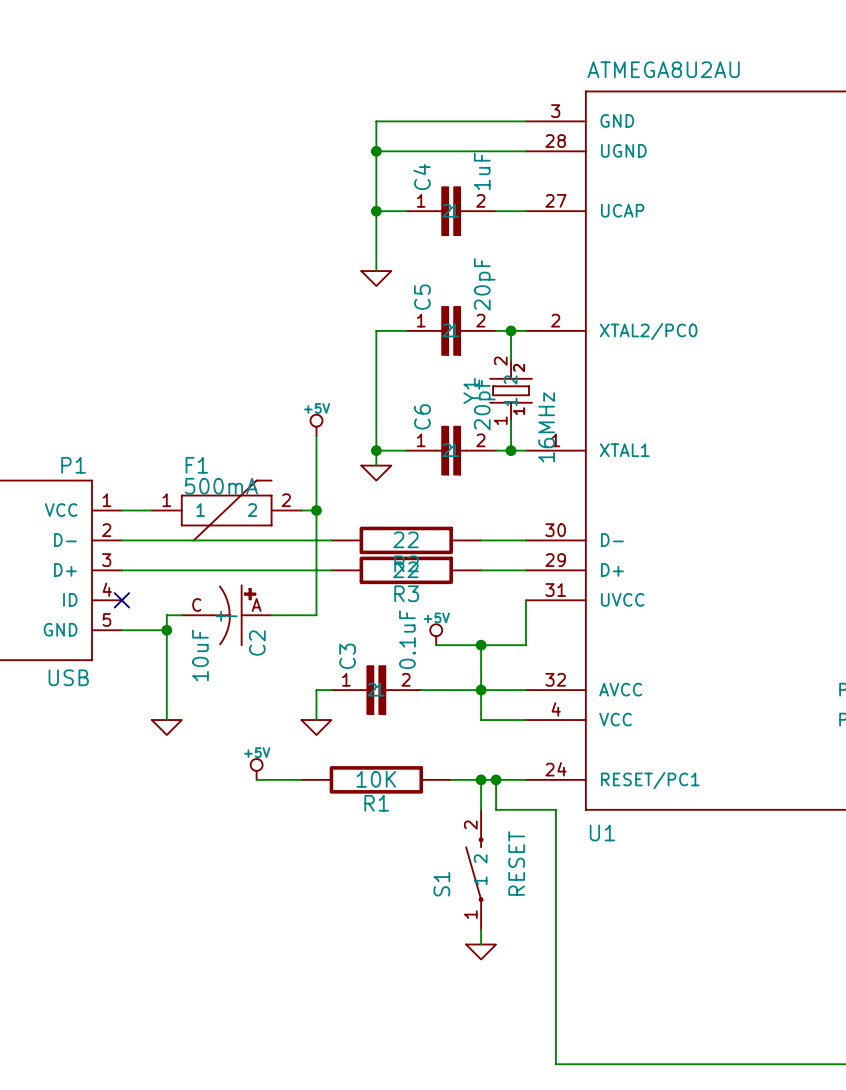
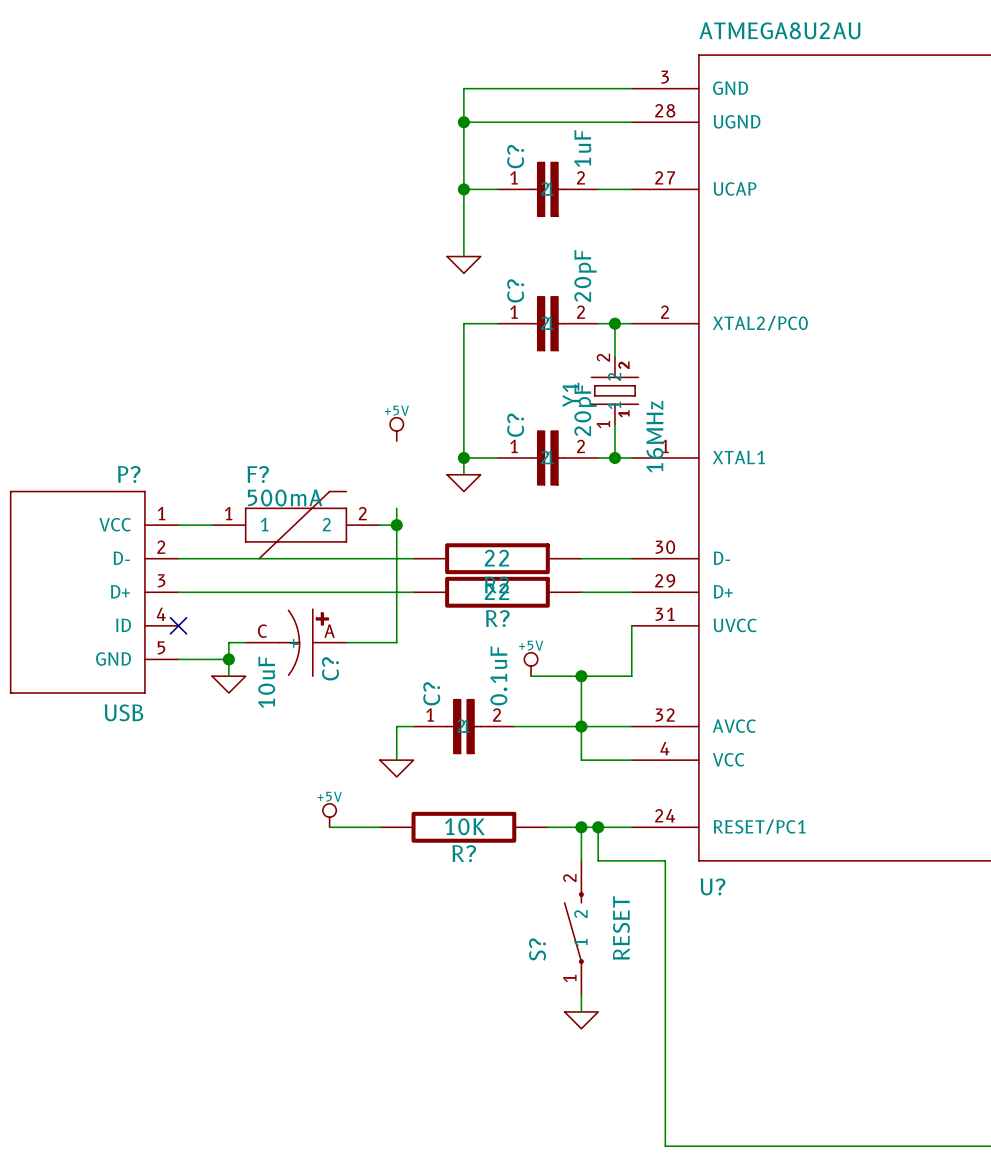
C4 name: C4 (422, 177) -> C? (515, 156)
C5 name: C5 (422, 297) -> C? (515, 290)
C6 name: C6 (422, 416) -> C? (515, 425)
wire: (316, 435) (316, 495) -> none
P1 name: P1 (73, 465) -> P? (129, 474)
F1 name: F1 (196, 465) -> F? (258, 474)
R3 name: R3 (406, 593) -> R? (497, 618)
C2 name: C2 (257, 643) -> C? (330, 668)
wire: (166, 645) (166, 720) -> none
C3 name: C3 (347, 656) -> C? (431, 693)
power symbol position: (166, 727) -> (228, 684)
R1 name: R1 (376, 803) -> R? (464, 853)
U1 name: U1 (602, 832) -> U? (712, 886)
S1 name: S1 (441, 884) -> S? (537, 949)

